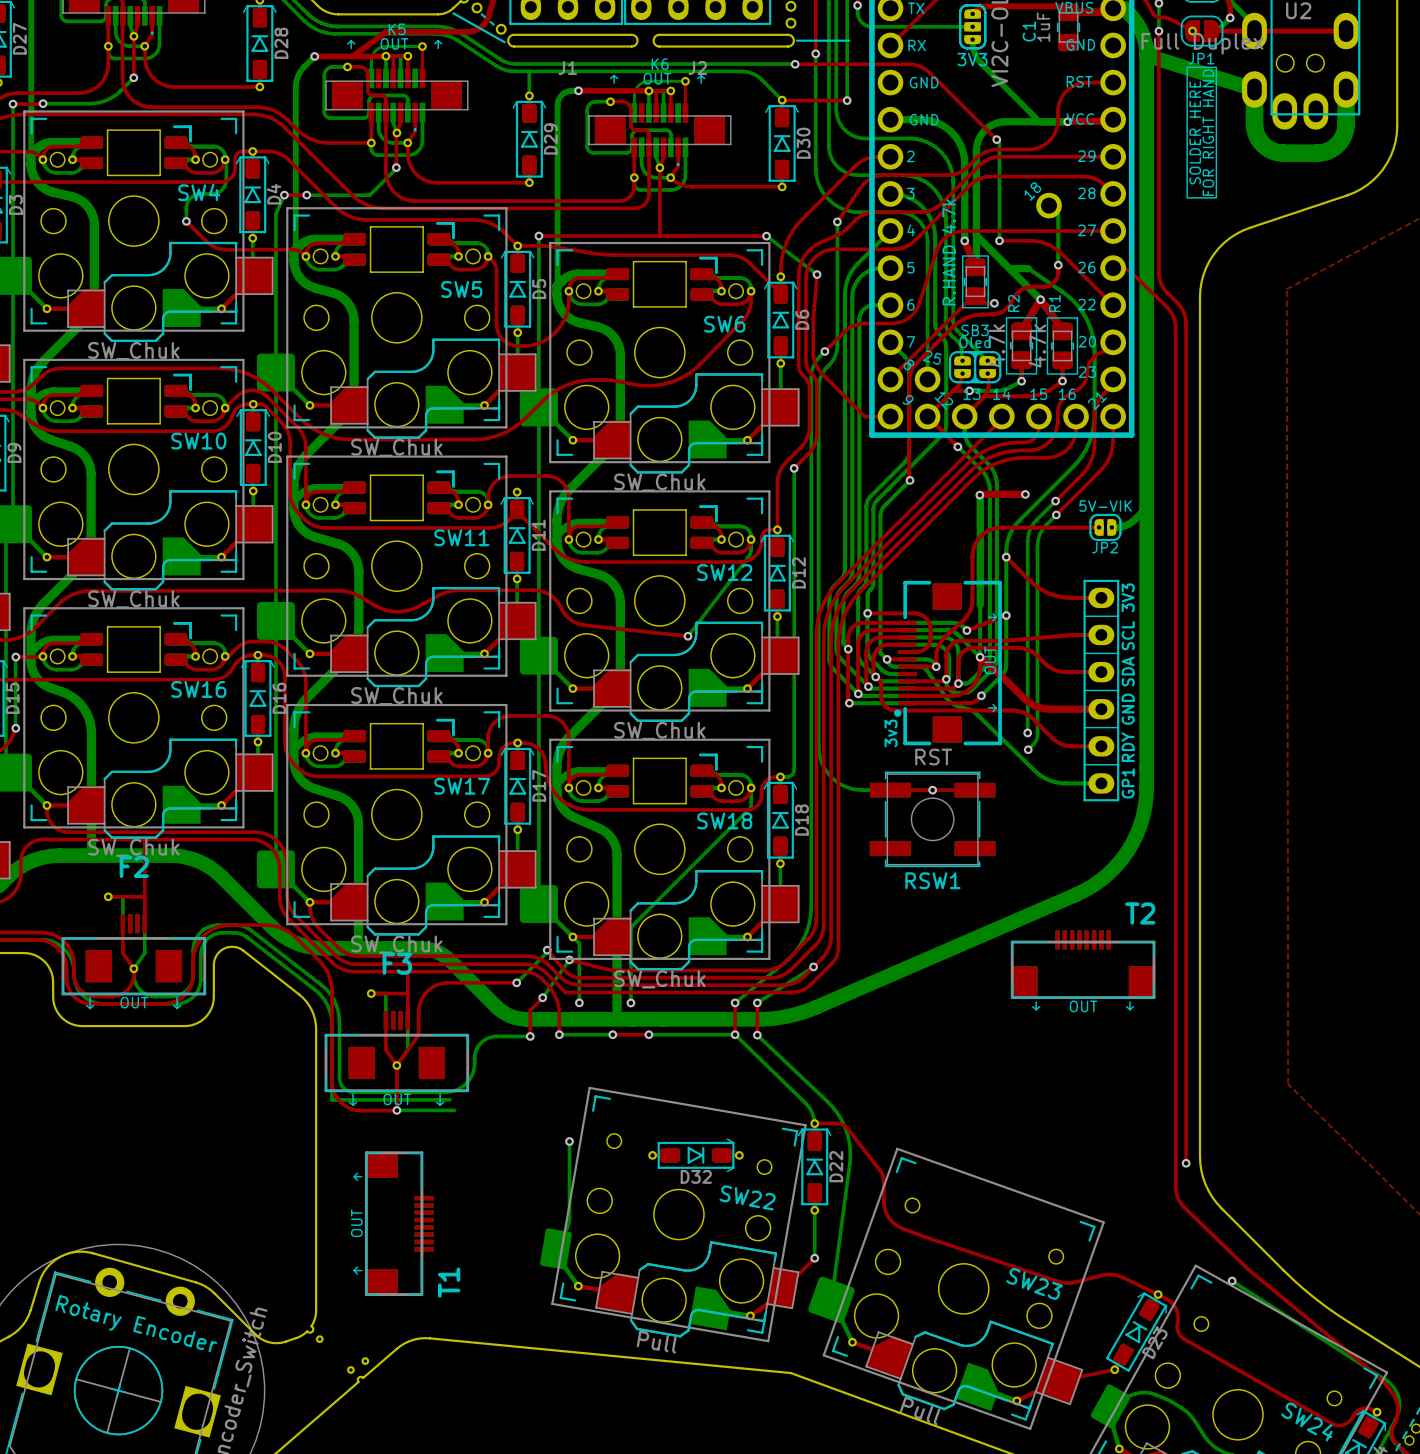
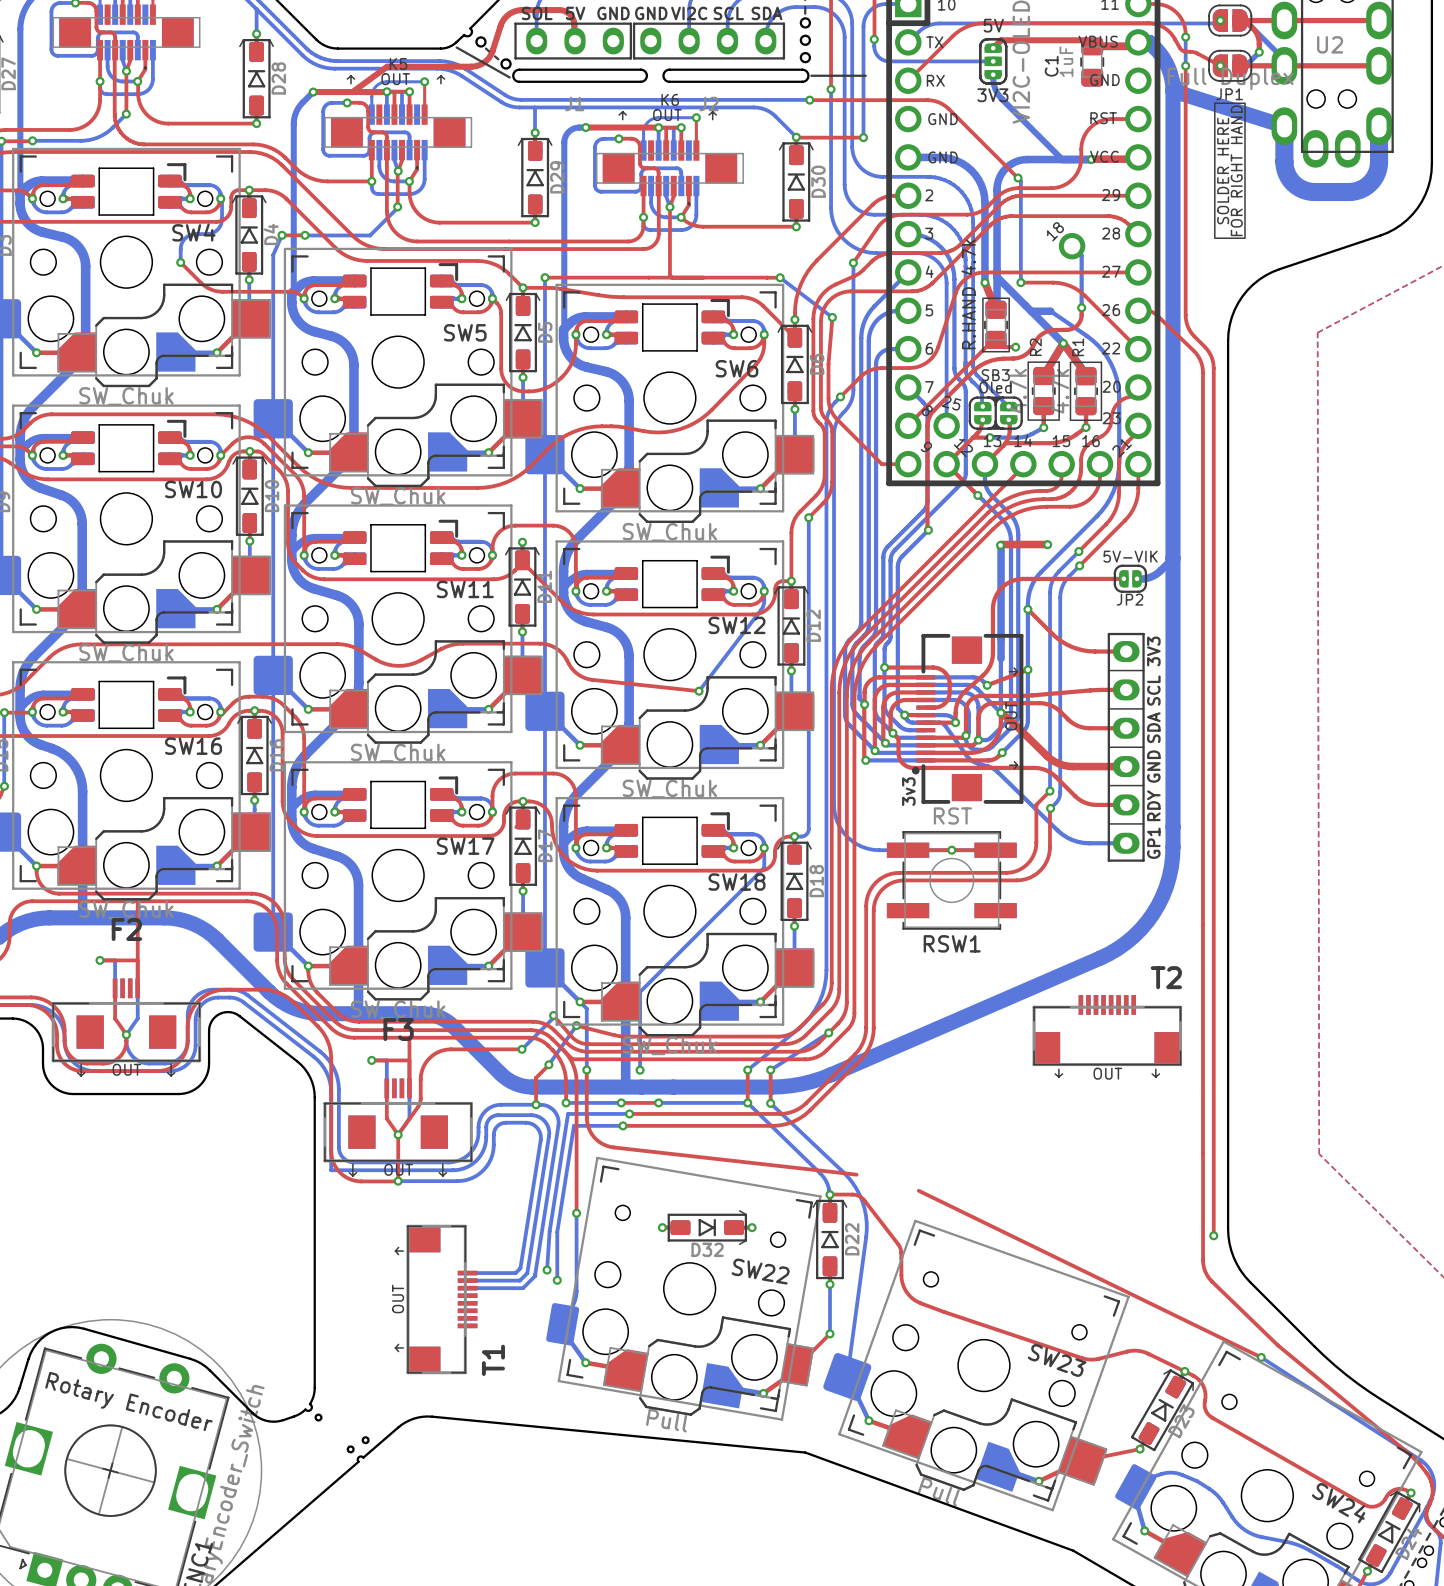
top track: none -> (1050, 791) (1036, 804) (1034, 852) (1029, 861) (1019, 869) (1006, 872) (895, 873) (881, 877) (873, 885) (866, 902) (864, 1038) (855, 1054) (803, 1105) (794, 1111) (783, 1113) (629, 1113)
top track: none -> (1050, 808) (1049, 854) (1042, 867) (1031, 877) (1016, 880) (900, 880) (890, 883) (880, 891) (873, 907) (873, 1027) (871, 1041) (863, 1056) (804, 1114) (792, 1121) (772, 1125) (623, 1125)
top track: none -> (563, 1050) (573, 1064) (576, 1077) (576, 1213)
top track: none -> (586, 1069) (587, 1124) (594, 1137) (606, 1145) (856, 1174)
bottom track: none -> (536, 1104) (544, 1105) (552, 1109) (556, 1114) (558, 1123) (535, 1275) (523, 1288) (467, 1288)
bottom track: none -> (629, 1113) (568, 1113) (549, 1231) (547, 1270)
via: none -> (629, 1113)
bottom track: none -> (623, 1125) (573, 1125) (557, 1232) (557, 1280)
via: none -> (623, 1125)
bottom track: none -> (453, 1170) (467, 1166) (478, 1157) (485, 1144) (487, 1122) (493, 1116) (533, 1115) (541, 1118) (547, 1125) (549, 1136) (527, 1273) (519, 1280) (467, 1280)
bottom track: none -> (457, 1181) (471, 1178) (486, 1166) (492, 1154) (494, 1131) (499, 1124) (527, 1122) (538, 1129) (540, 1140) (520, 1268) (515, 1273) (467, 1273)
top track: none -> (918, 1190) (1261, 1357)
via: none -> (547, 1270)
via: none -> (557, 1280)
T1 position: (393, 1223) -> (436, 1299)

